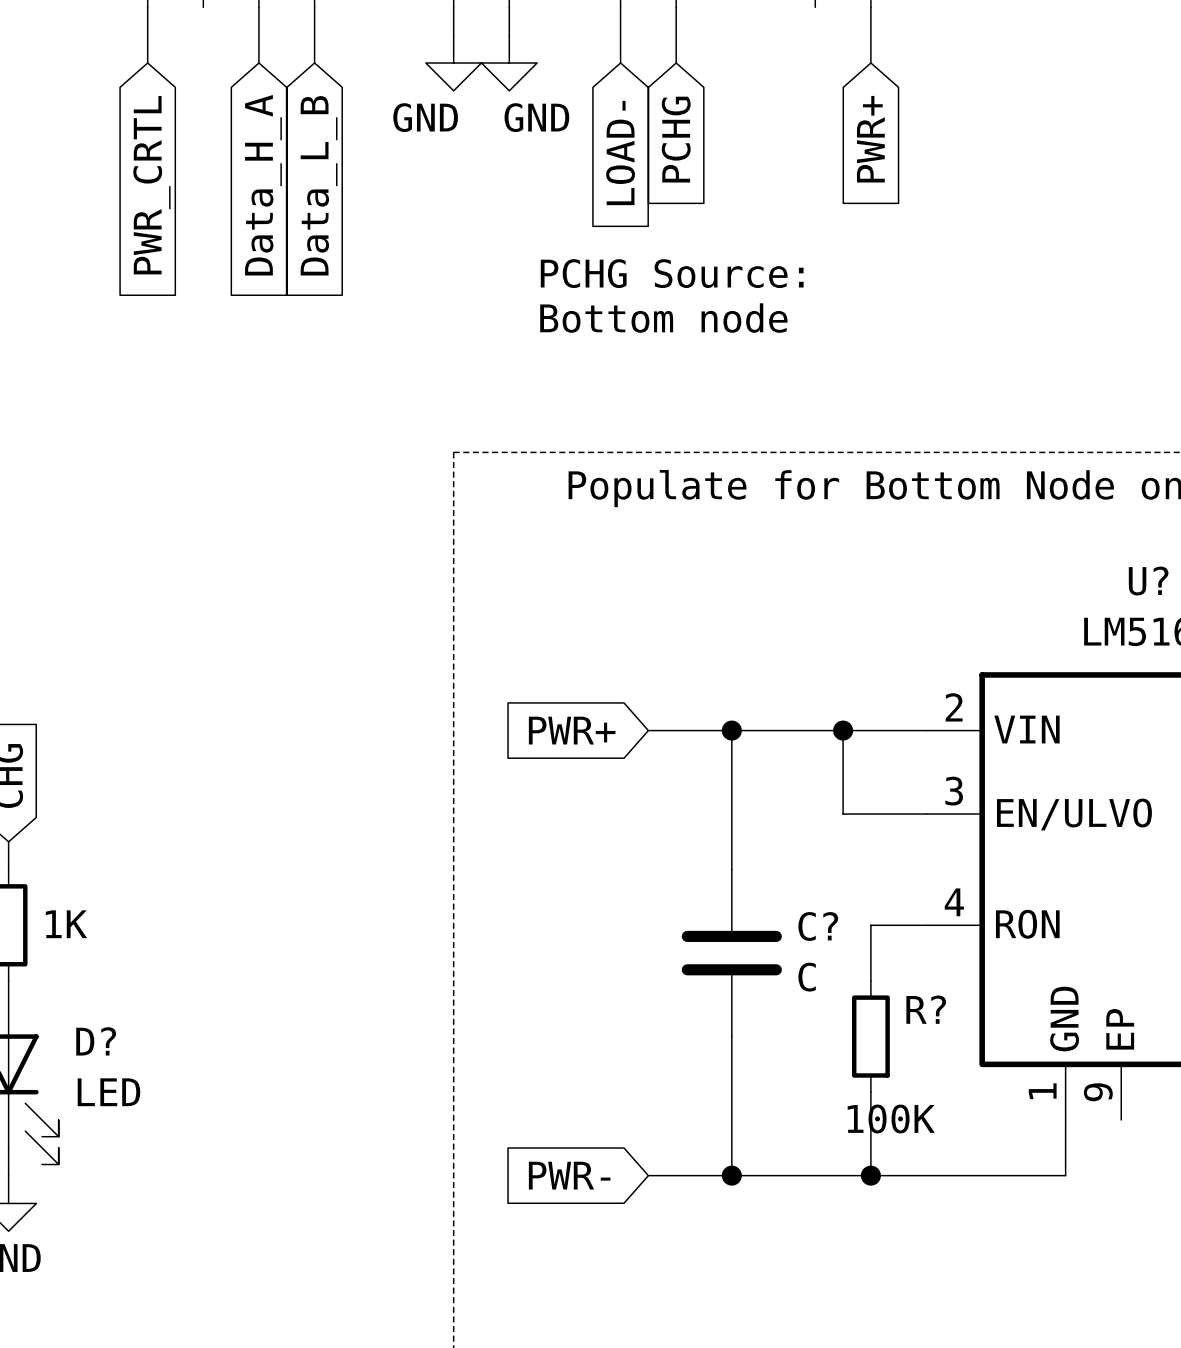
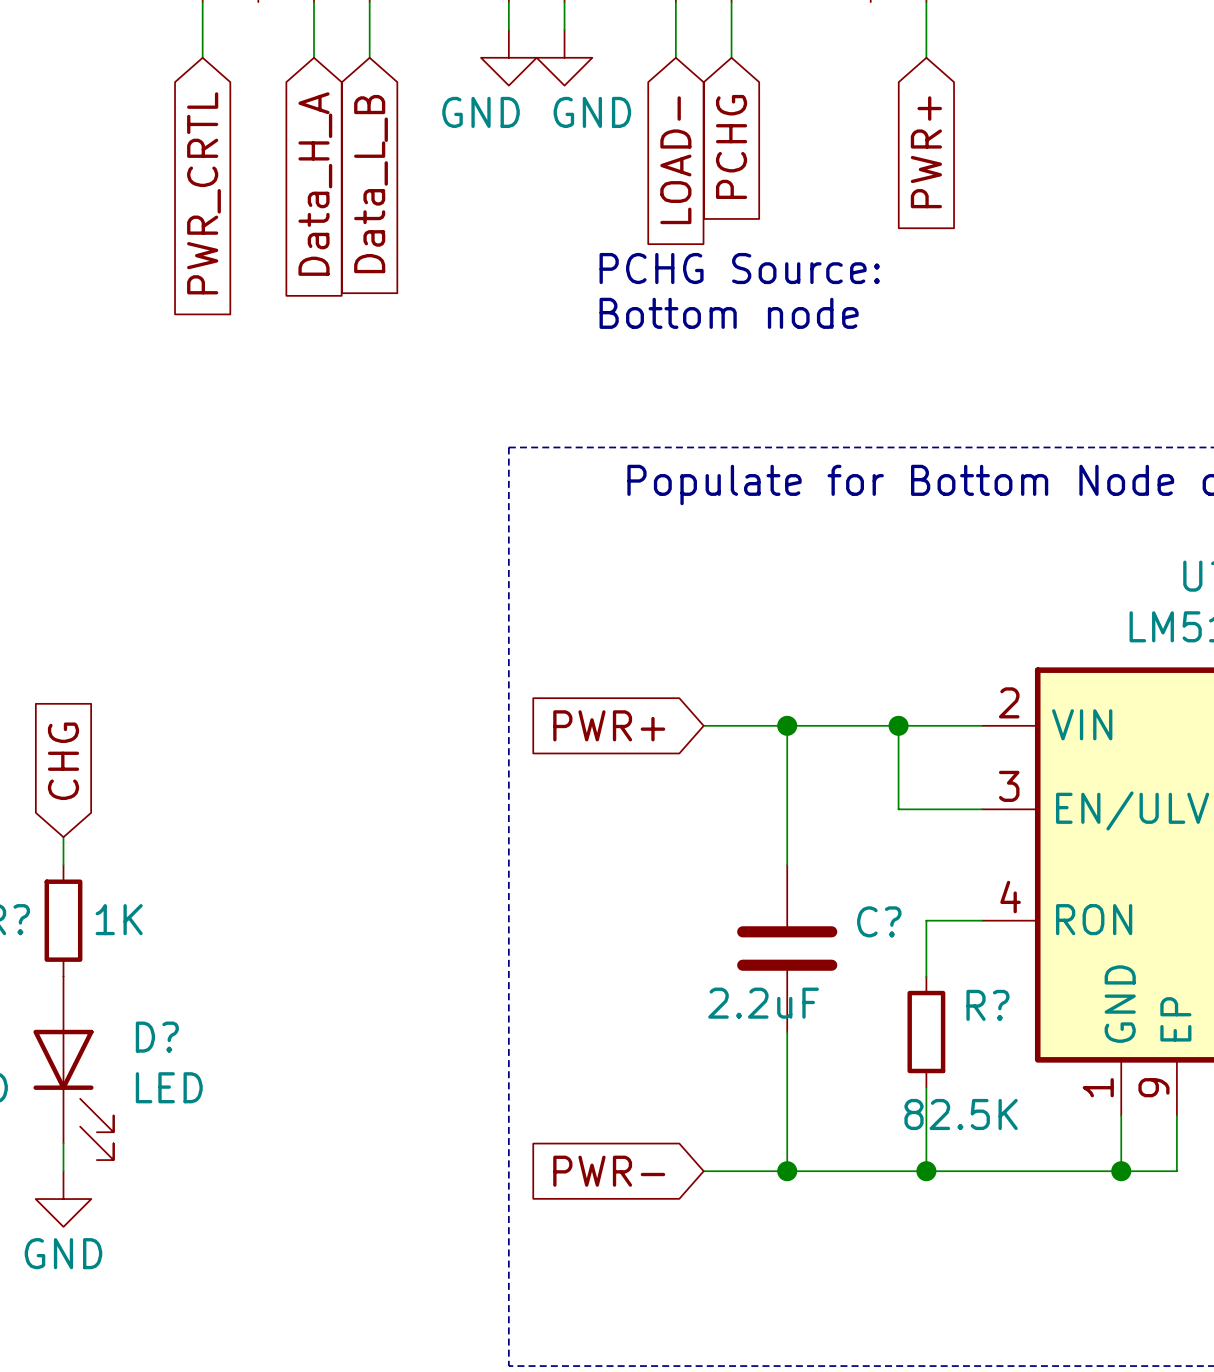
C? value: C (807, 977) -> 2.2uF (763, 1003)
R? value: 100K (891, 1118) -> 82.5K (961, 1114)
wire: none -> (1176, 1115) (1176, 1171) (1121, 1171)
junction: none -> (1121, 1171)

